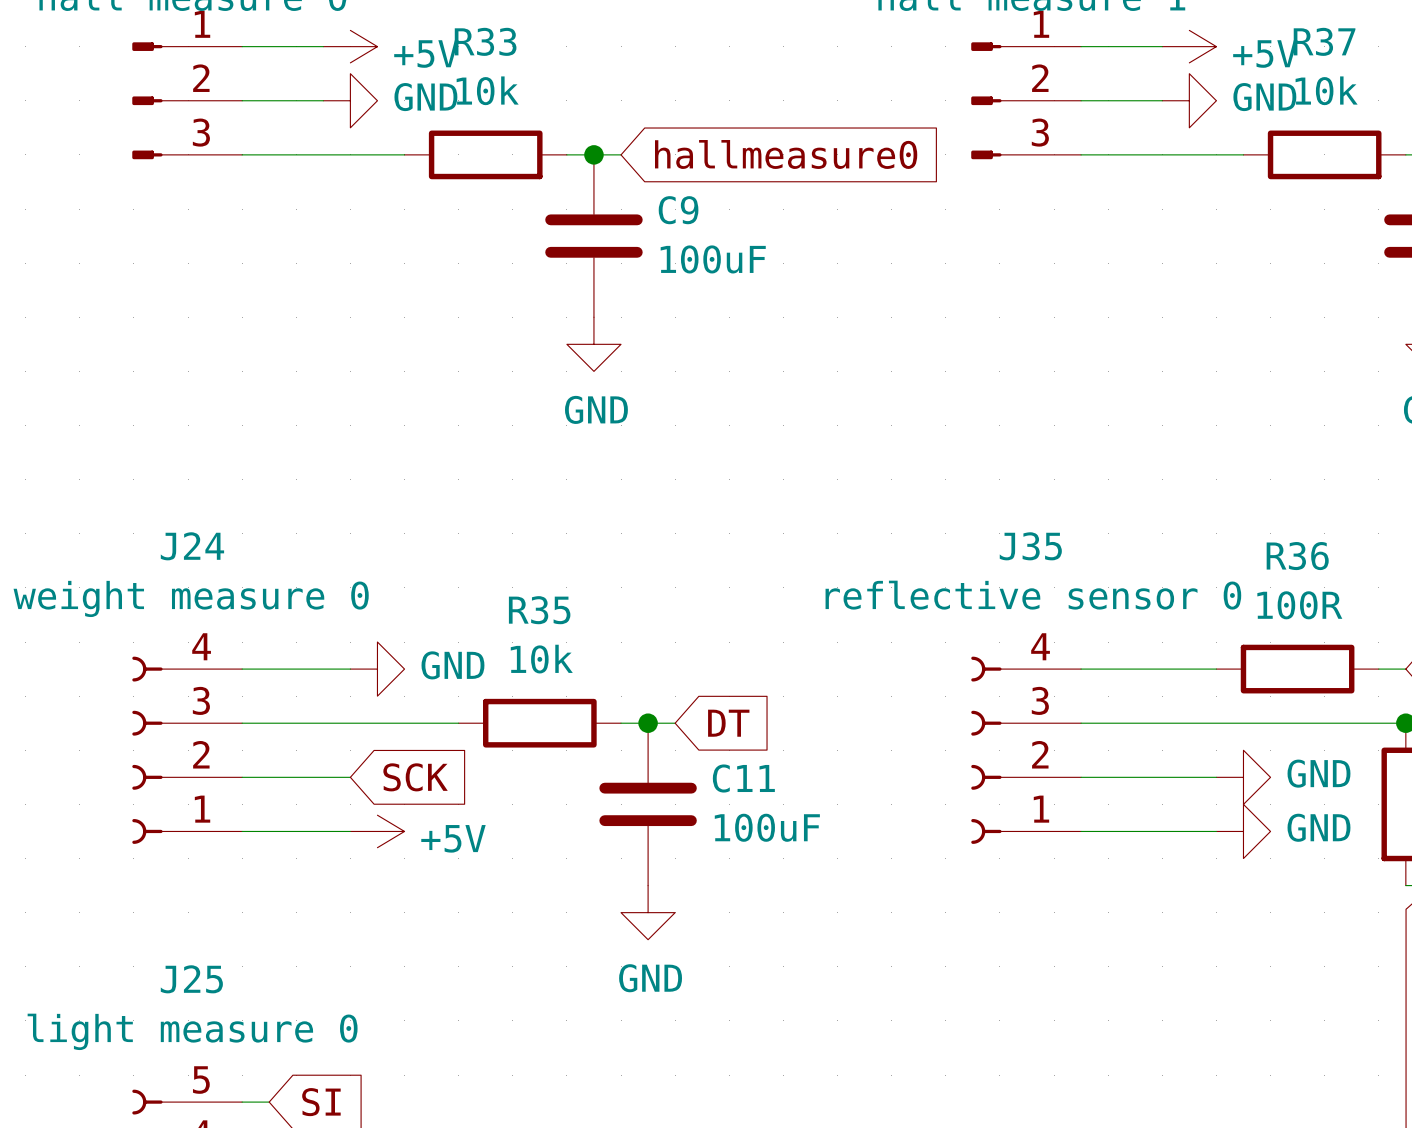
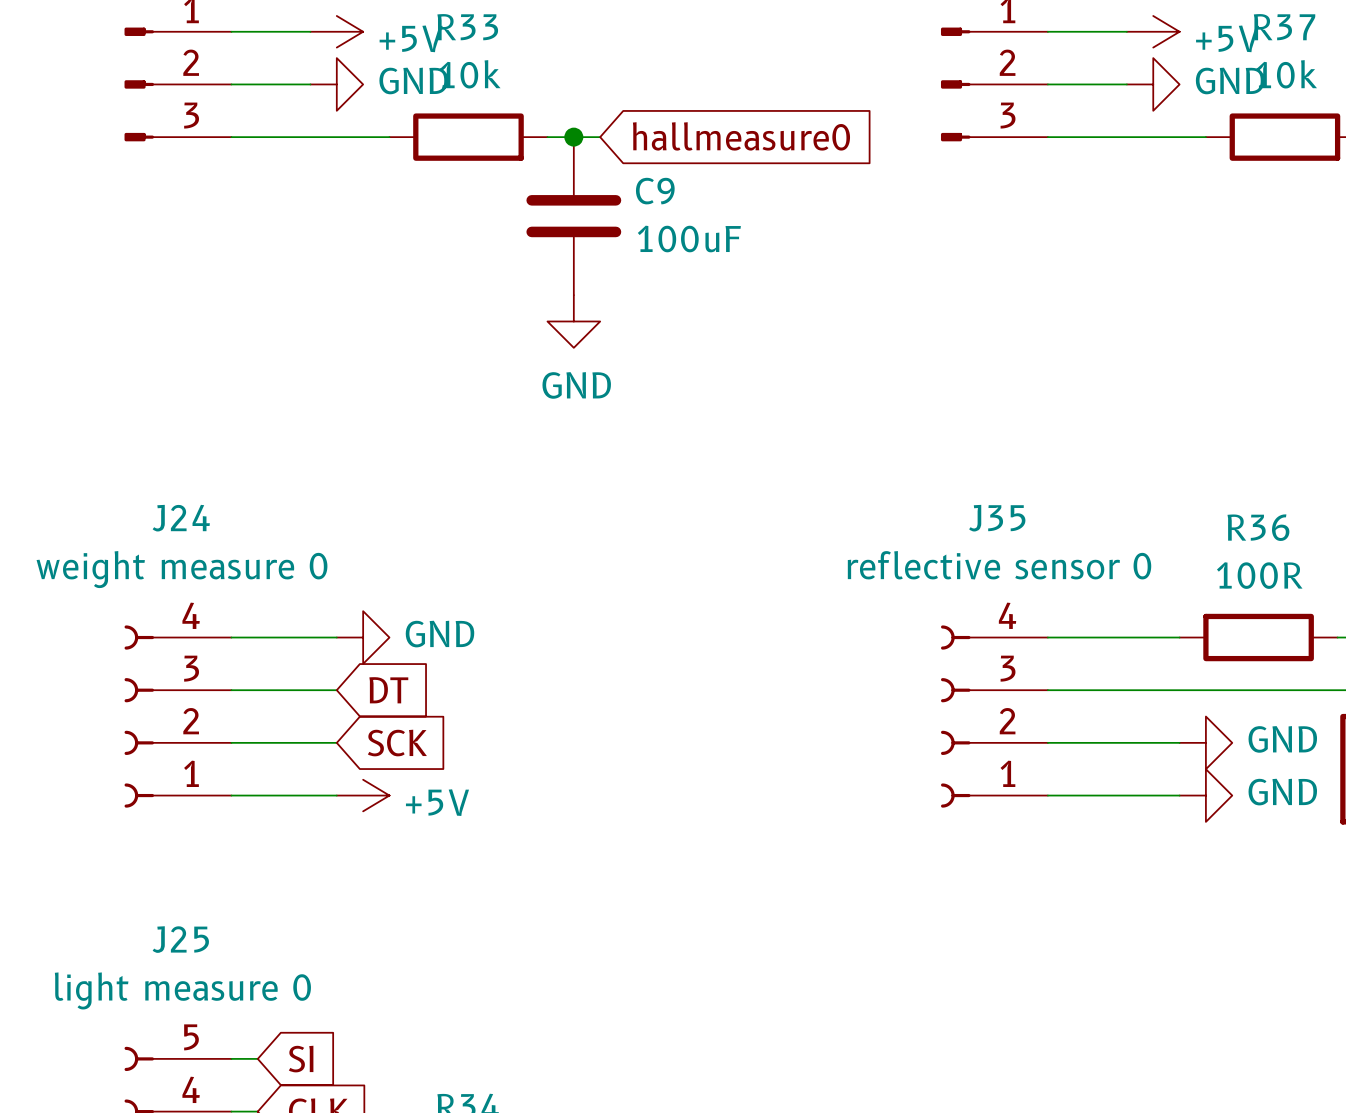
wire: (350, 723) (458, 723) -> none
R35: 10k (539, 723) -> none
wire: (621, 723) (675, 723) -> none
junction: (648, 723) -> none
global label position: DT (728, 723) -> DT (388, 690)
C11: 100uF (648, 804) -> none
power symbol: GND (648, 912) -> none

